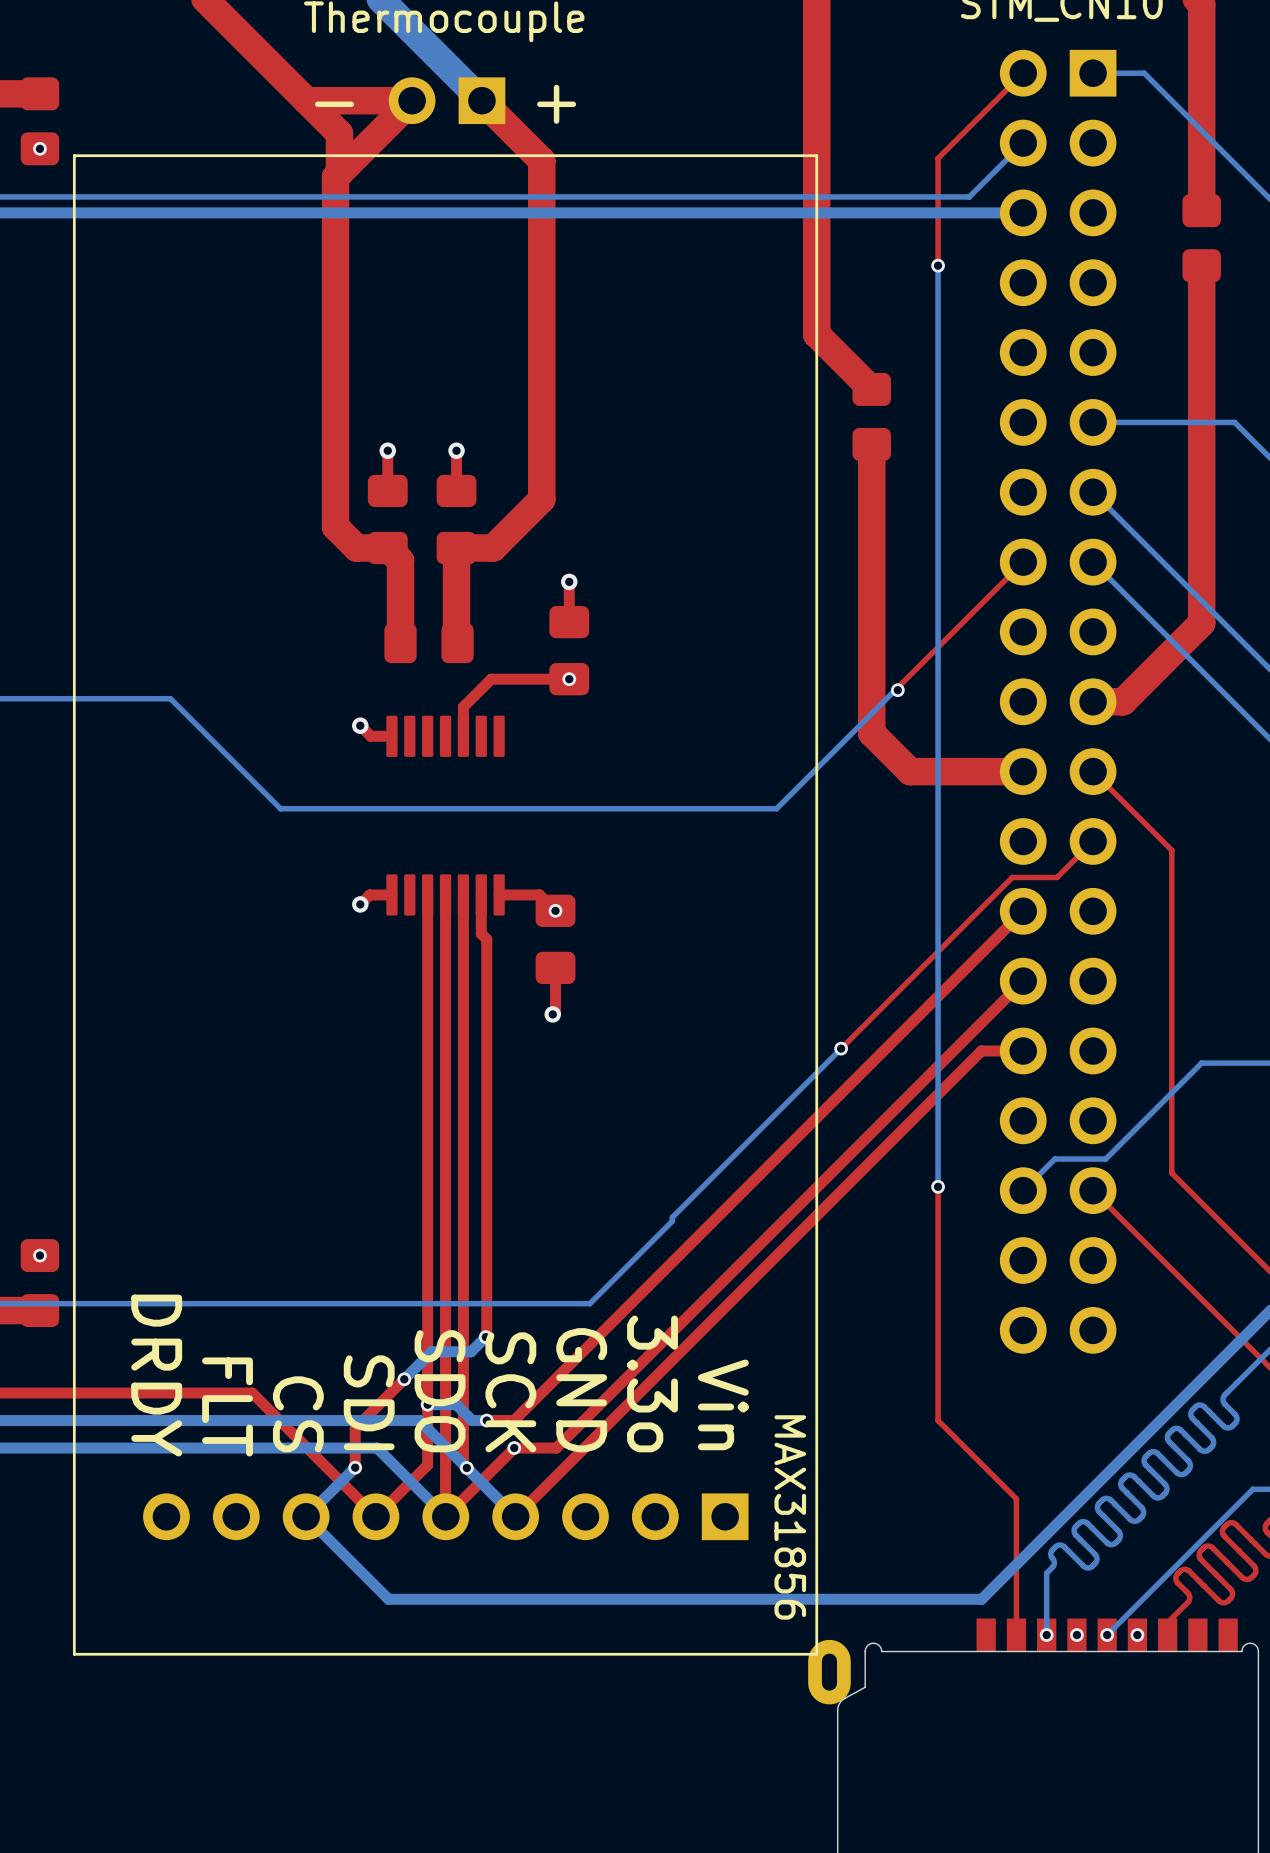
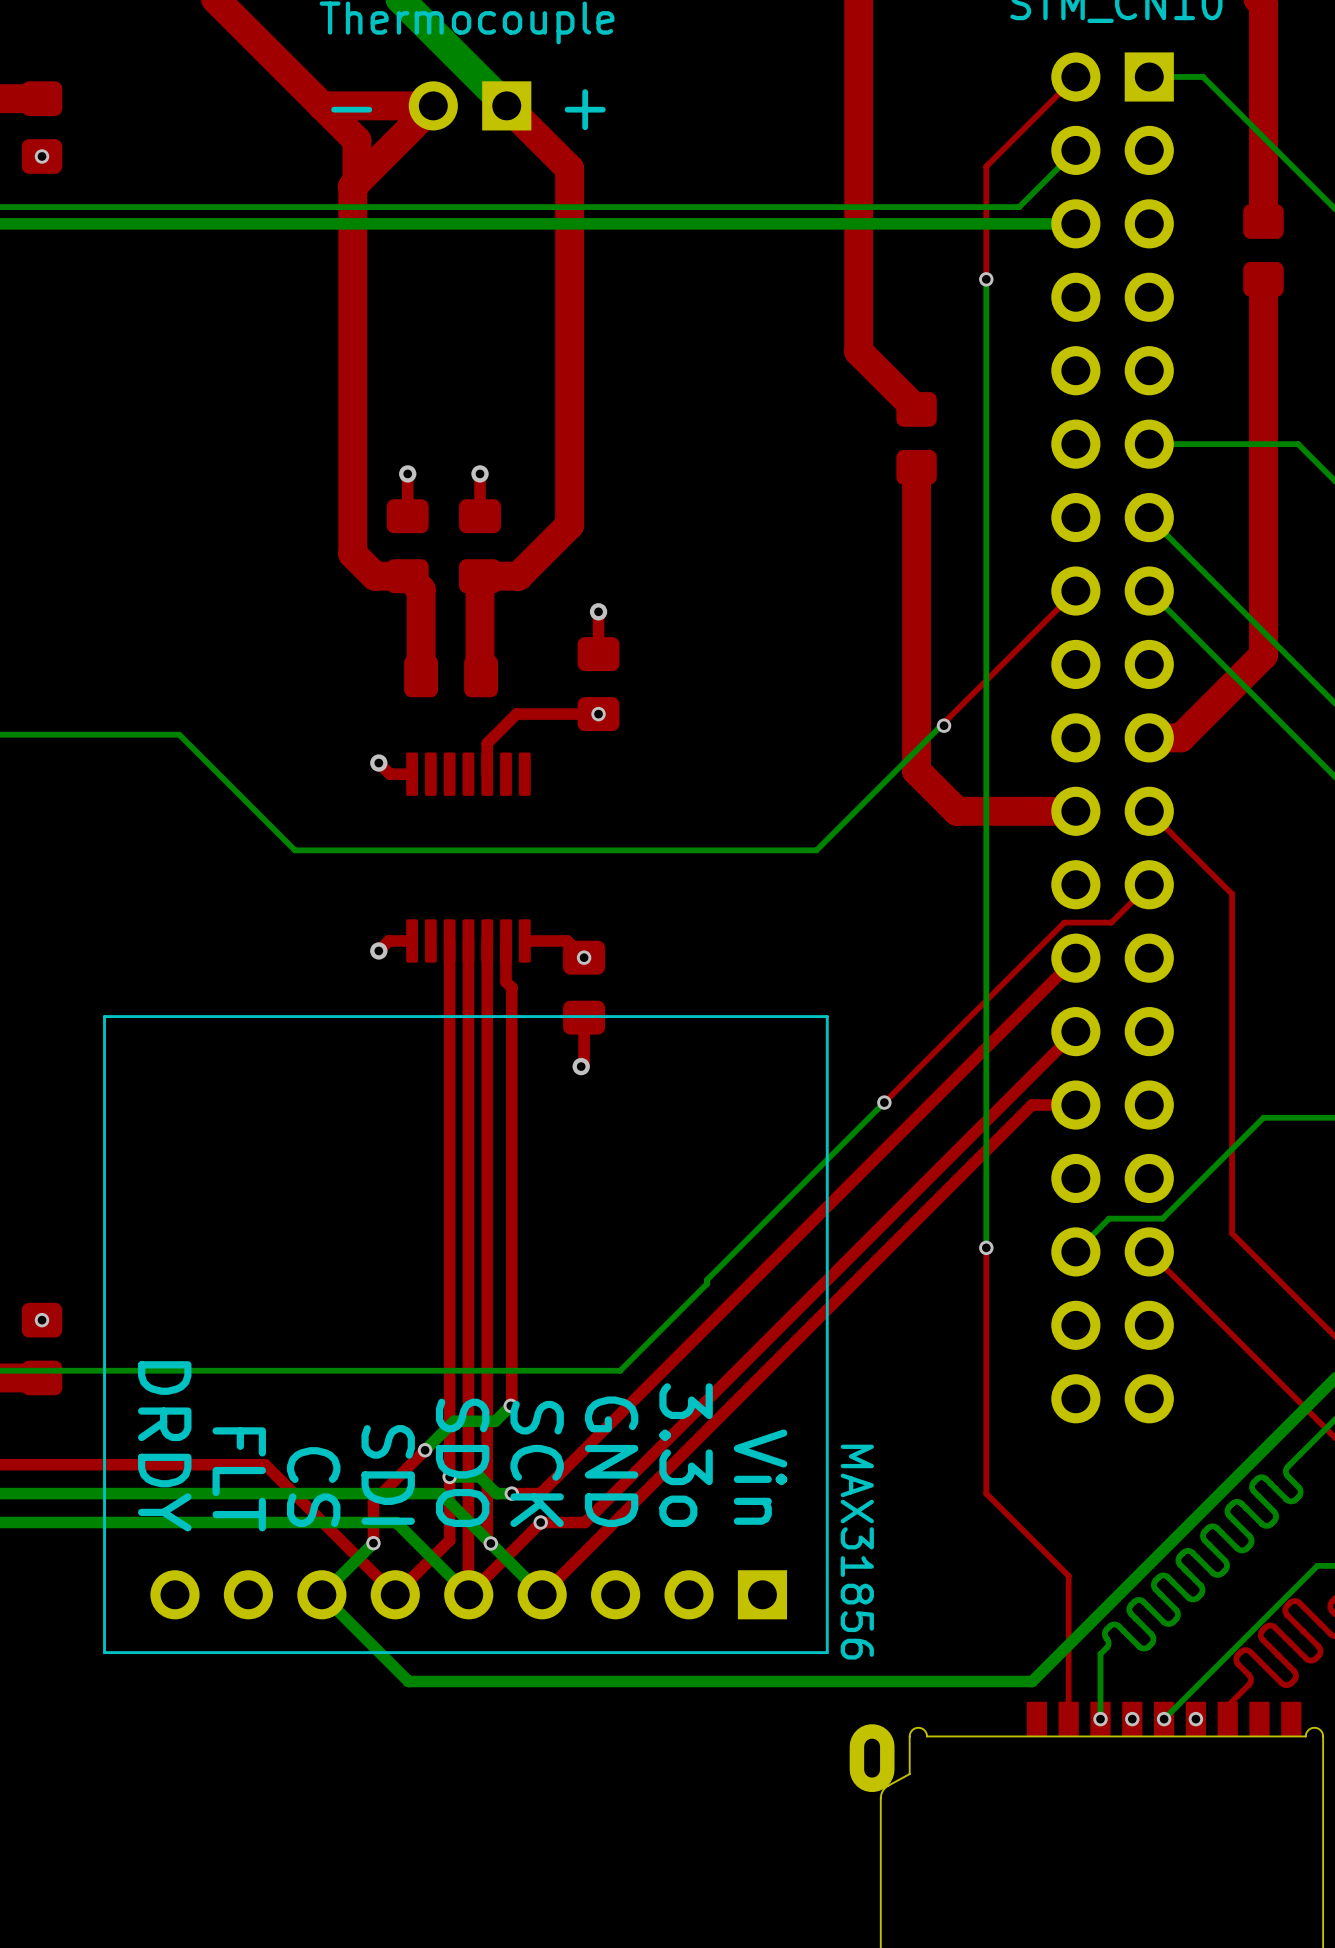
line: (816, 155) (74, 155) (74, 1654) (816, 1654) (816, 155) -> none
line: none -> (827, 1016) (104, 1016) (104, 1652) (827, 1652) (827, 1016)
text position: MAX31856 (790, 1517) -> MAX31856 (857, 1552)

